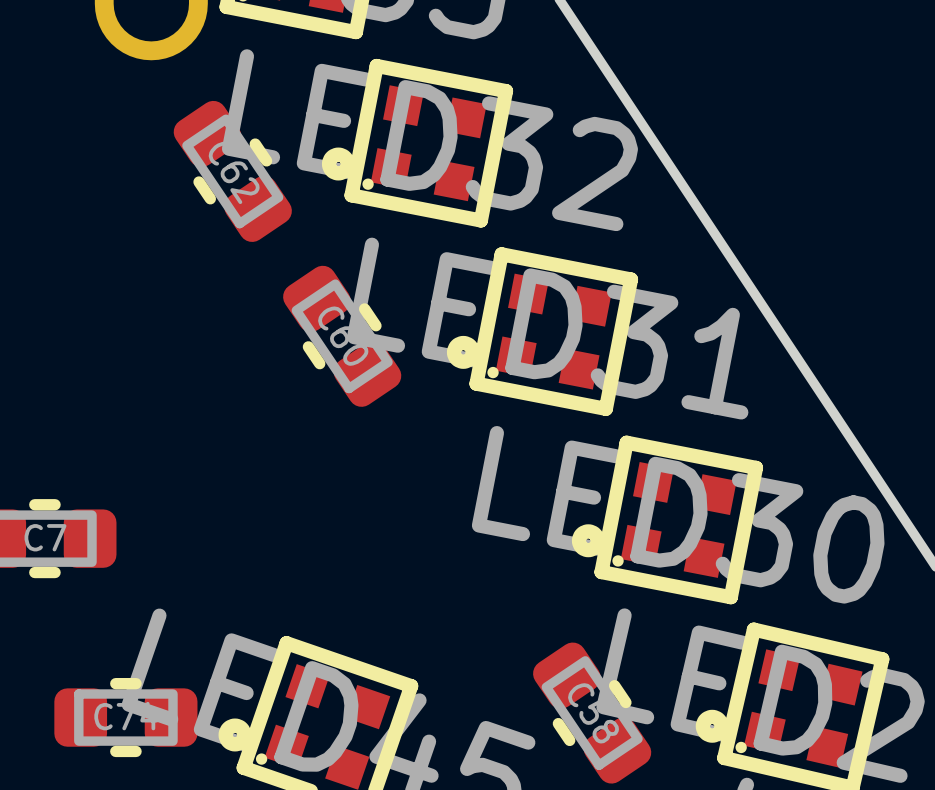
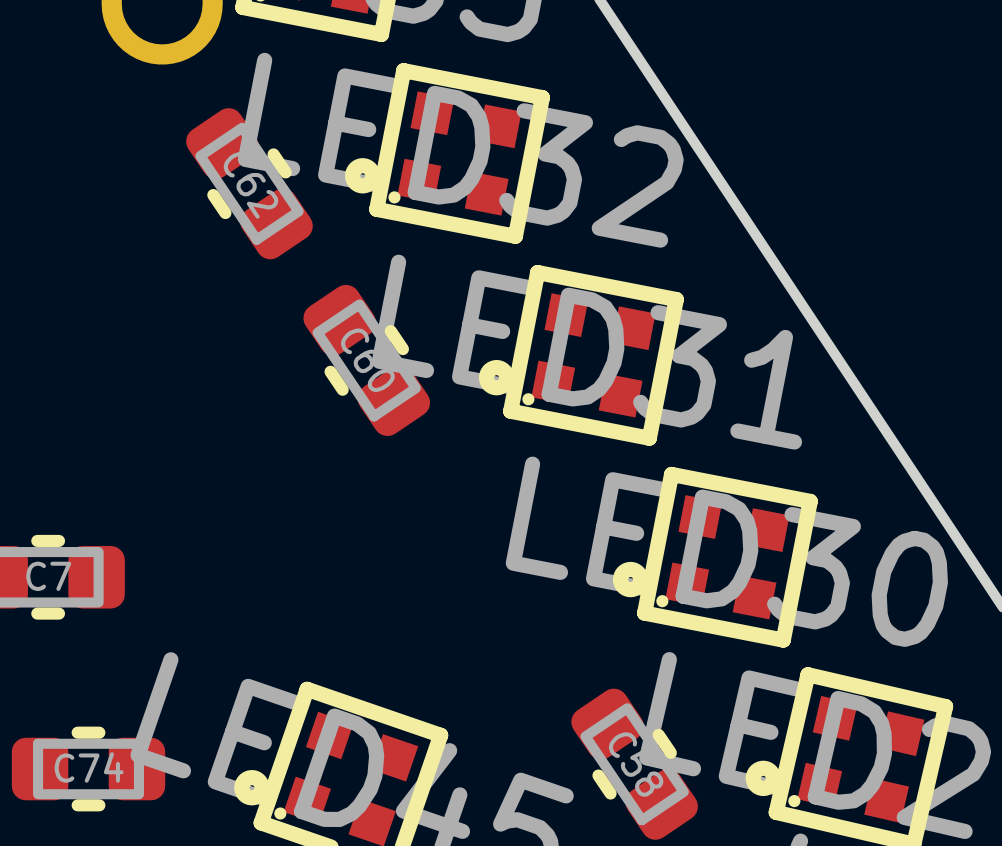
C74 position: (125, 717) -> (88, 769)

